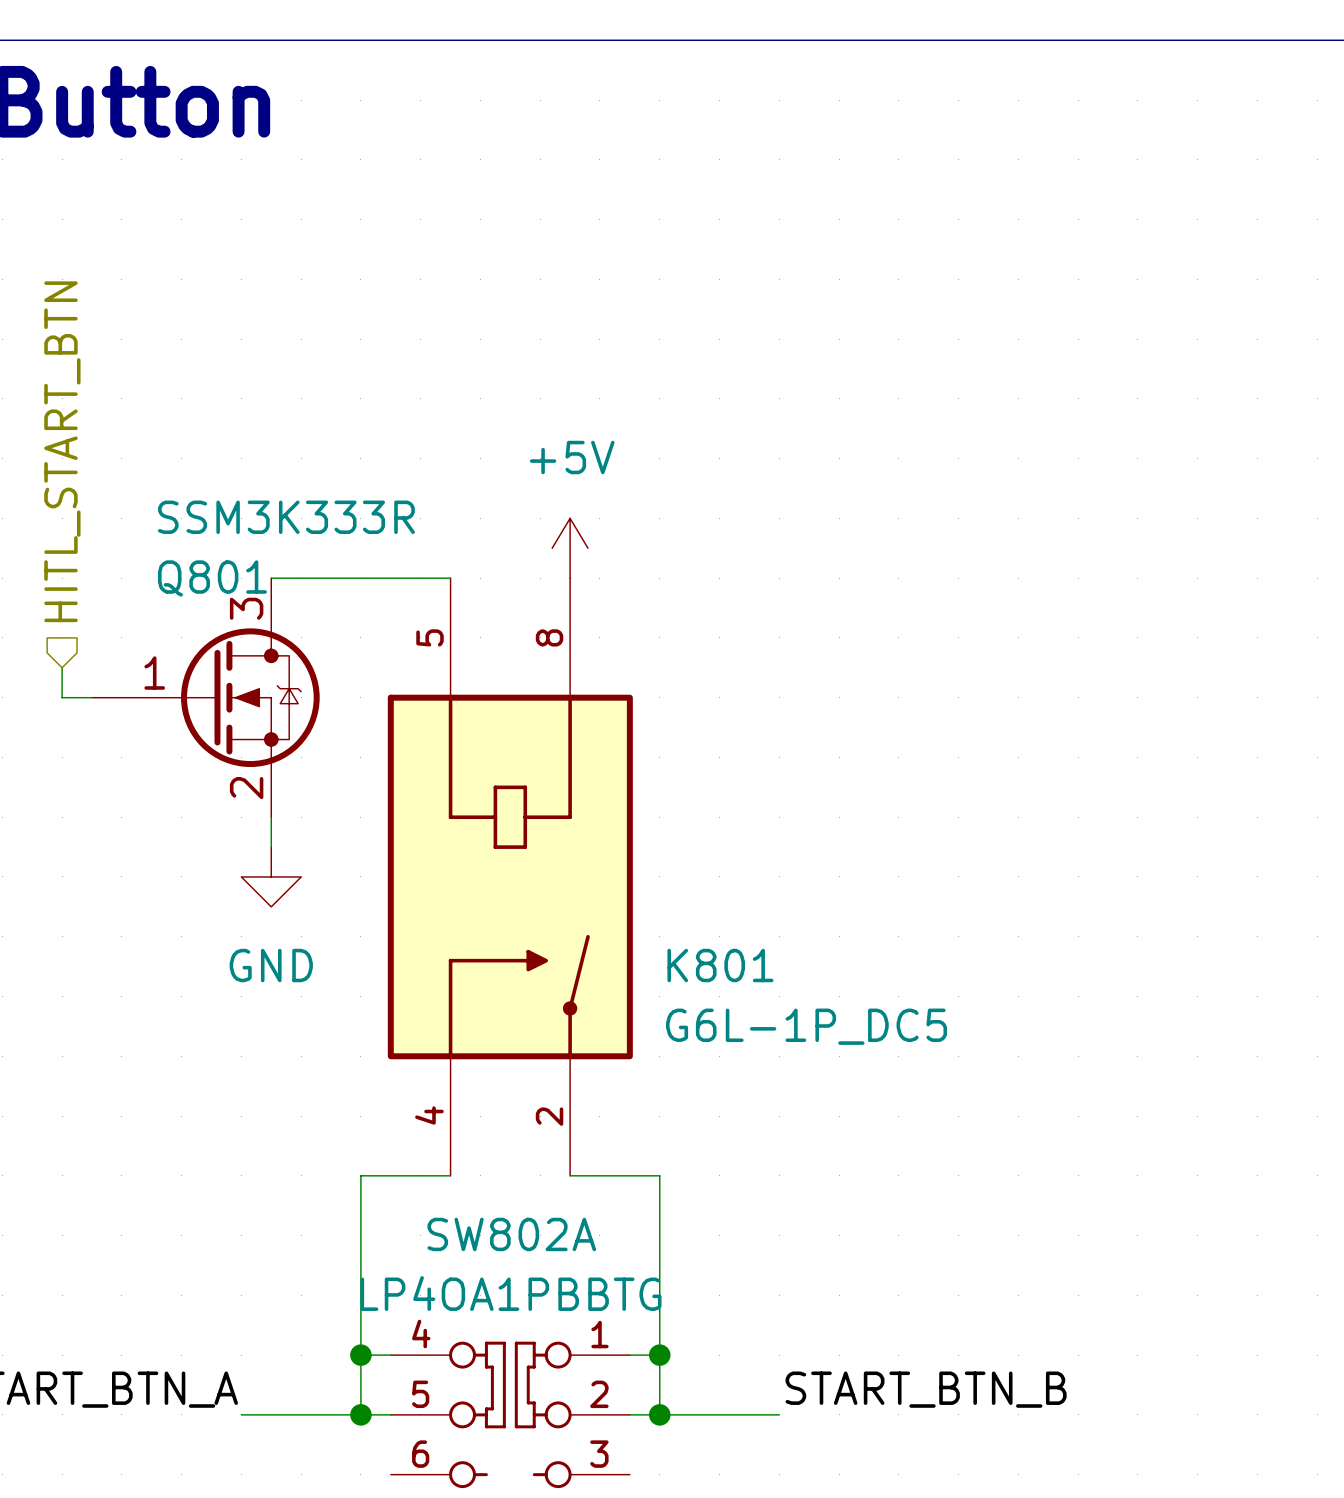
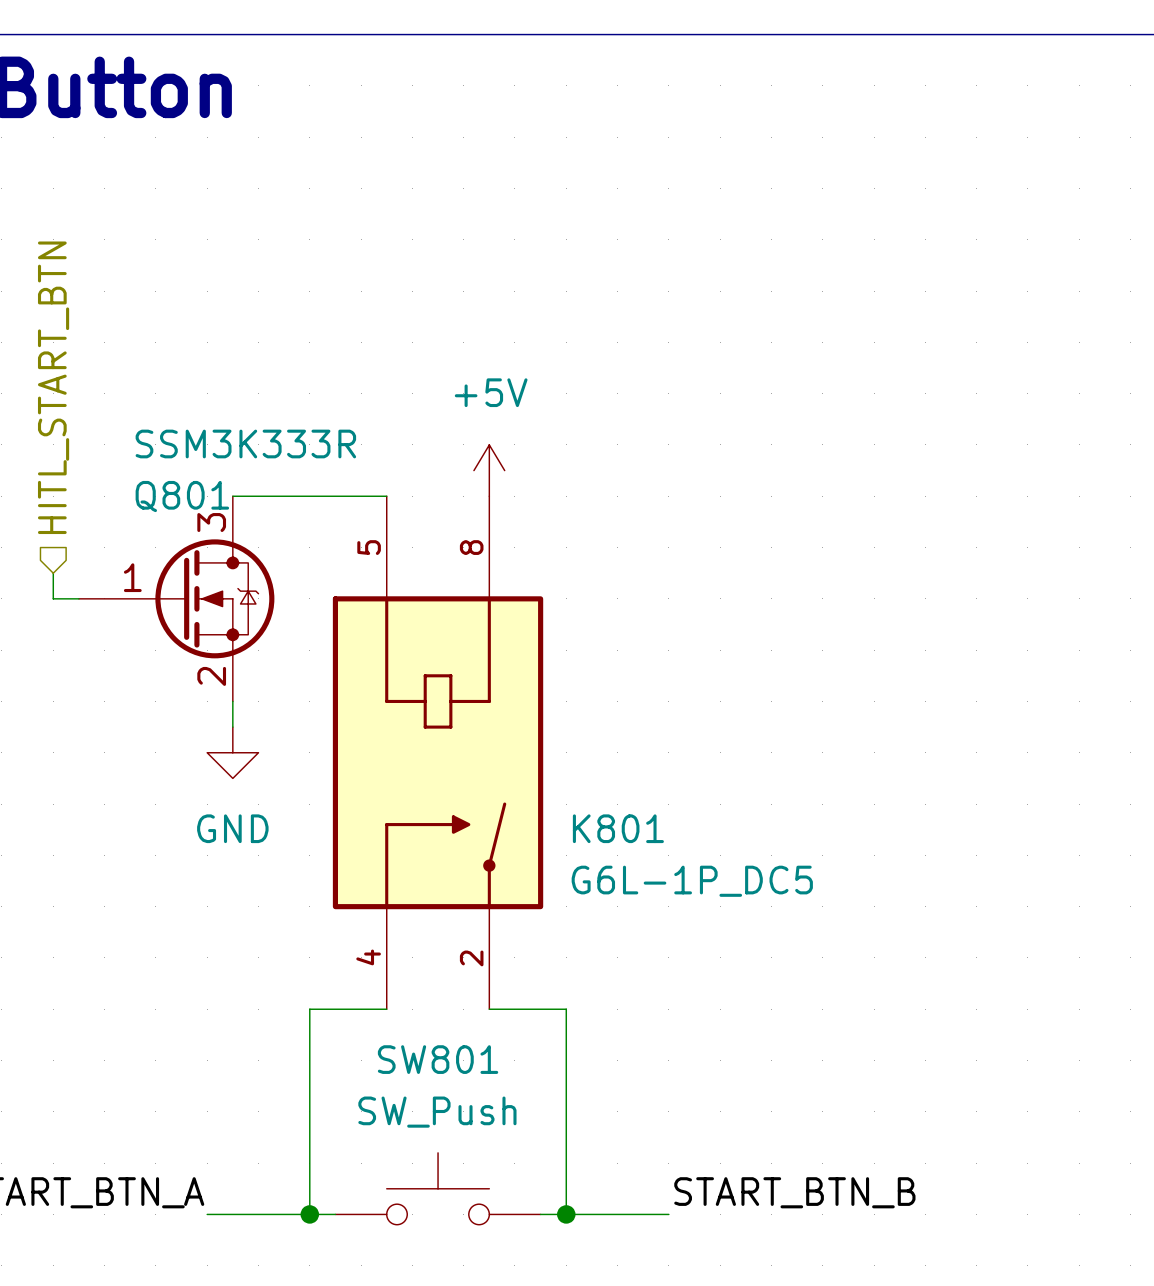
wire: (360, 1355) (390, 1355) -> none
junction: (360, 1355) -> none
wire: (629, 1355) (659, 1355) -> none
junction: (659, 1355) -> none
SW801: none -> SW_Push (438, 1188)
SW802A: LP4OA1PBBTG (510, 1414) -> none

